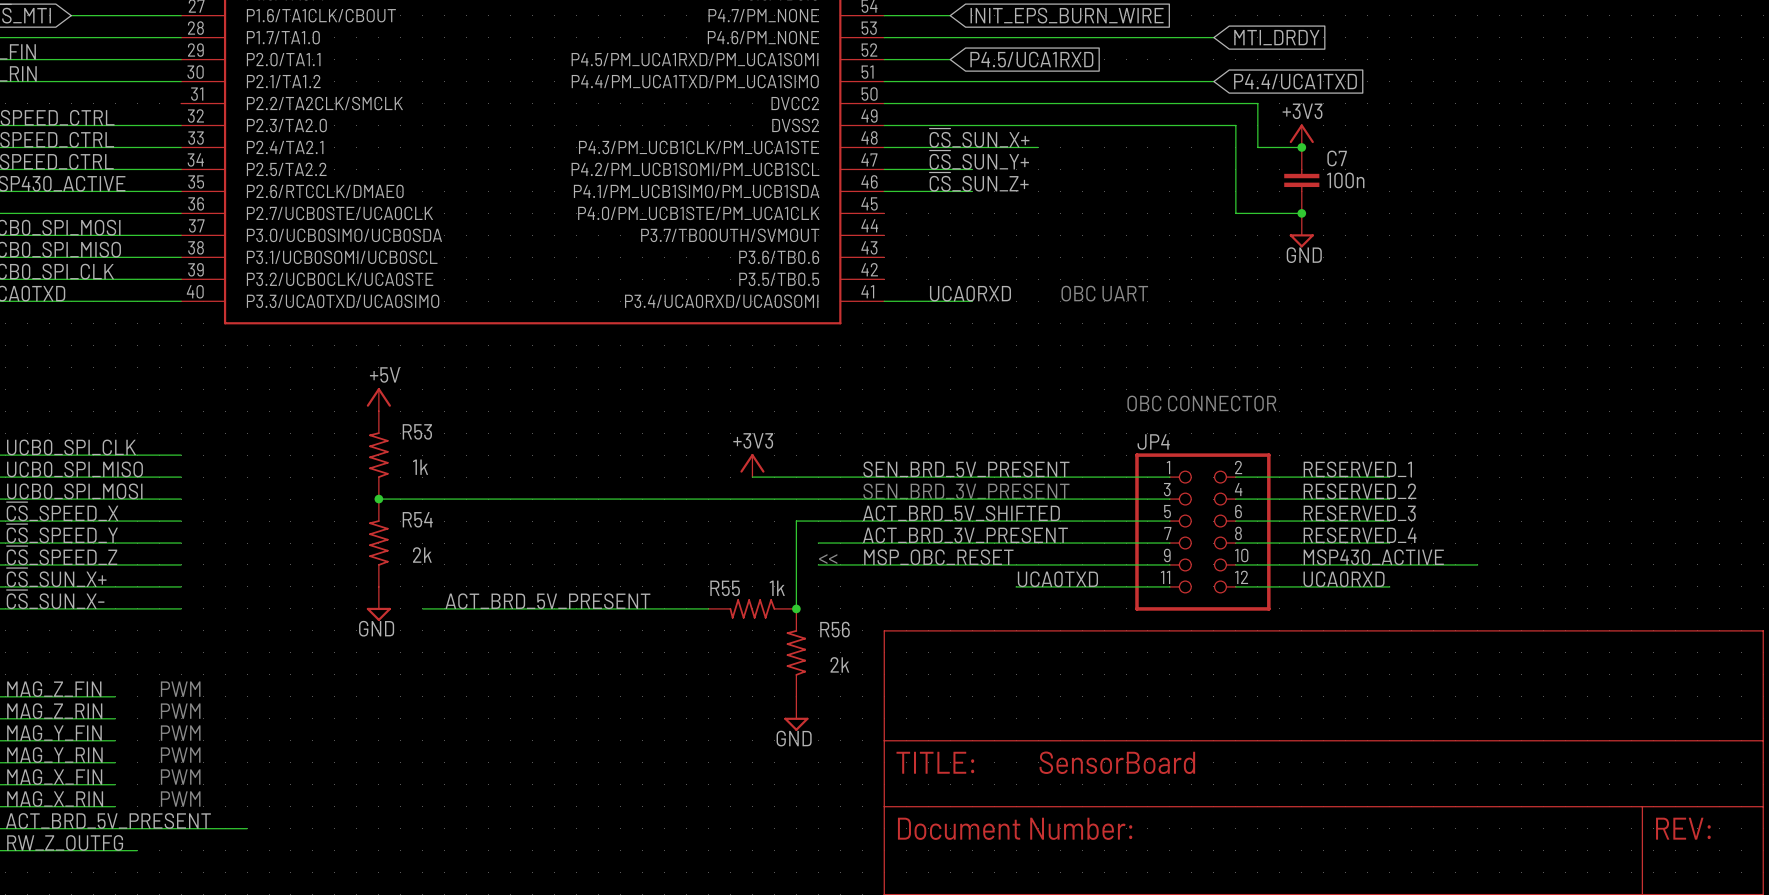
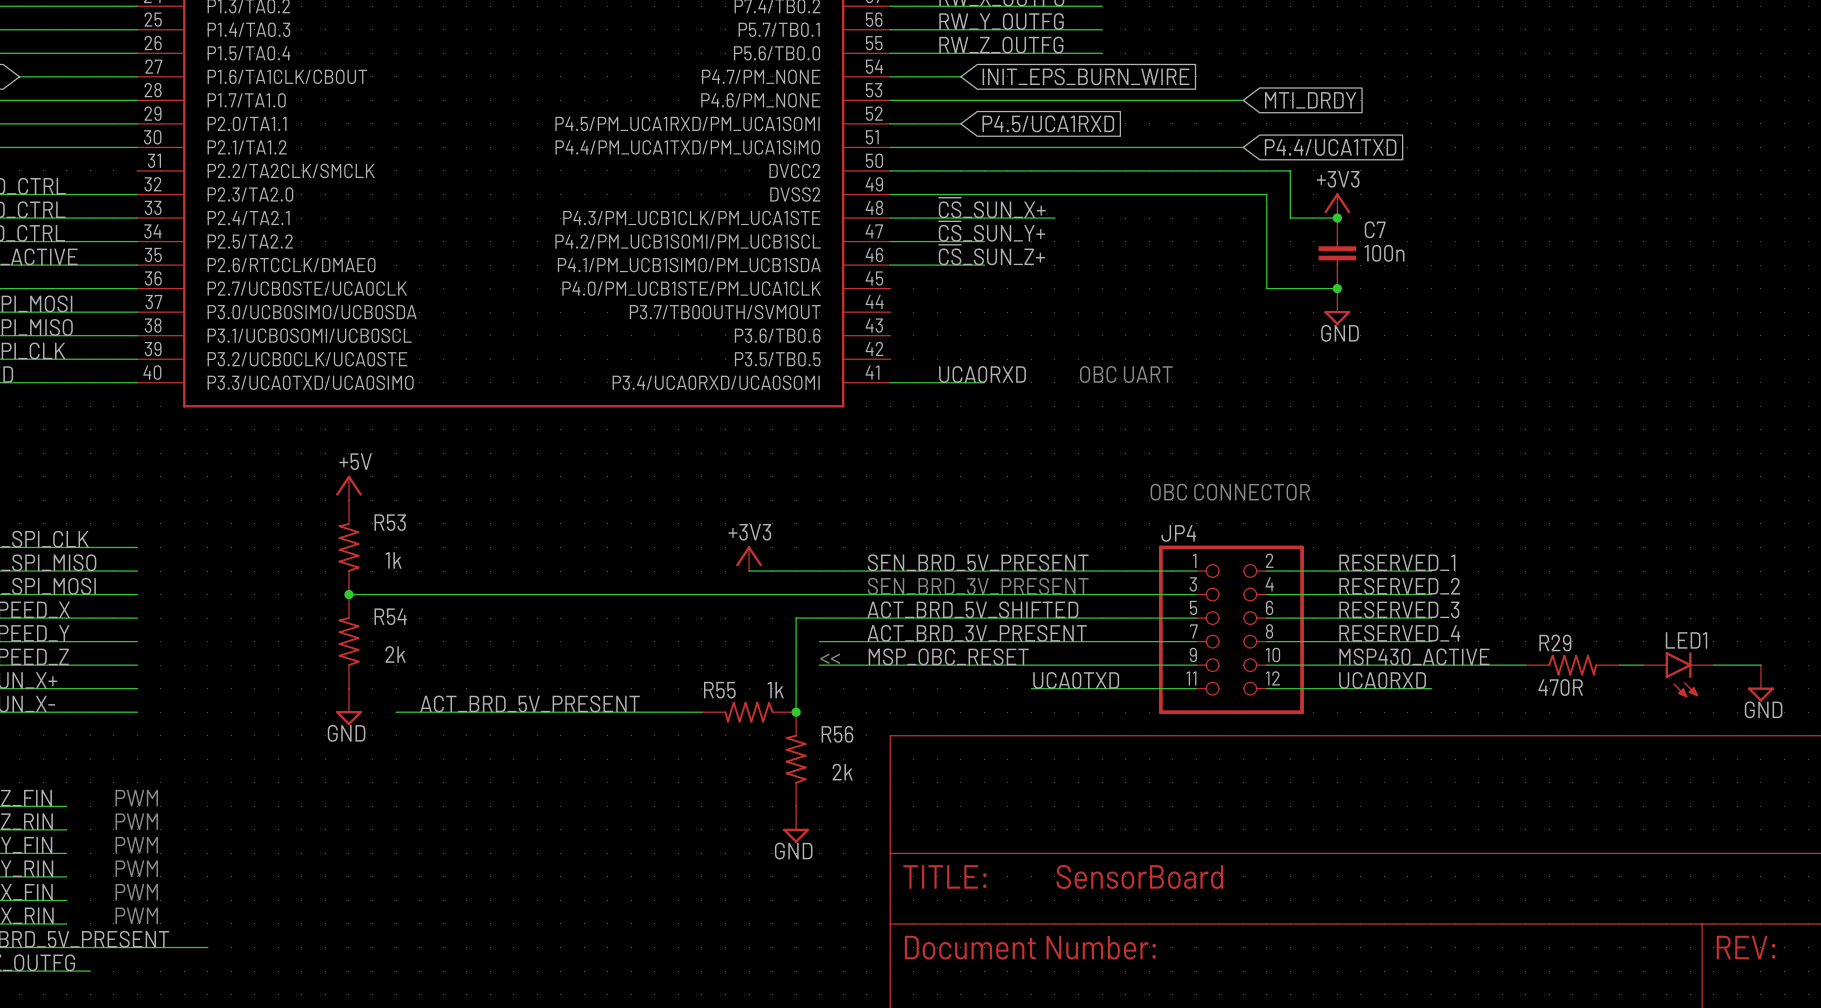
R29: none -> 470R (1572, 665)
wire: none -> (1619, 665) (1643, 665)
wire: none -> (1713, 665) (1760, 665)
LED1: none -> (1678, 674)
power symbol: none -> GND (1760, 683)

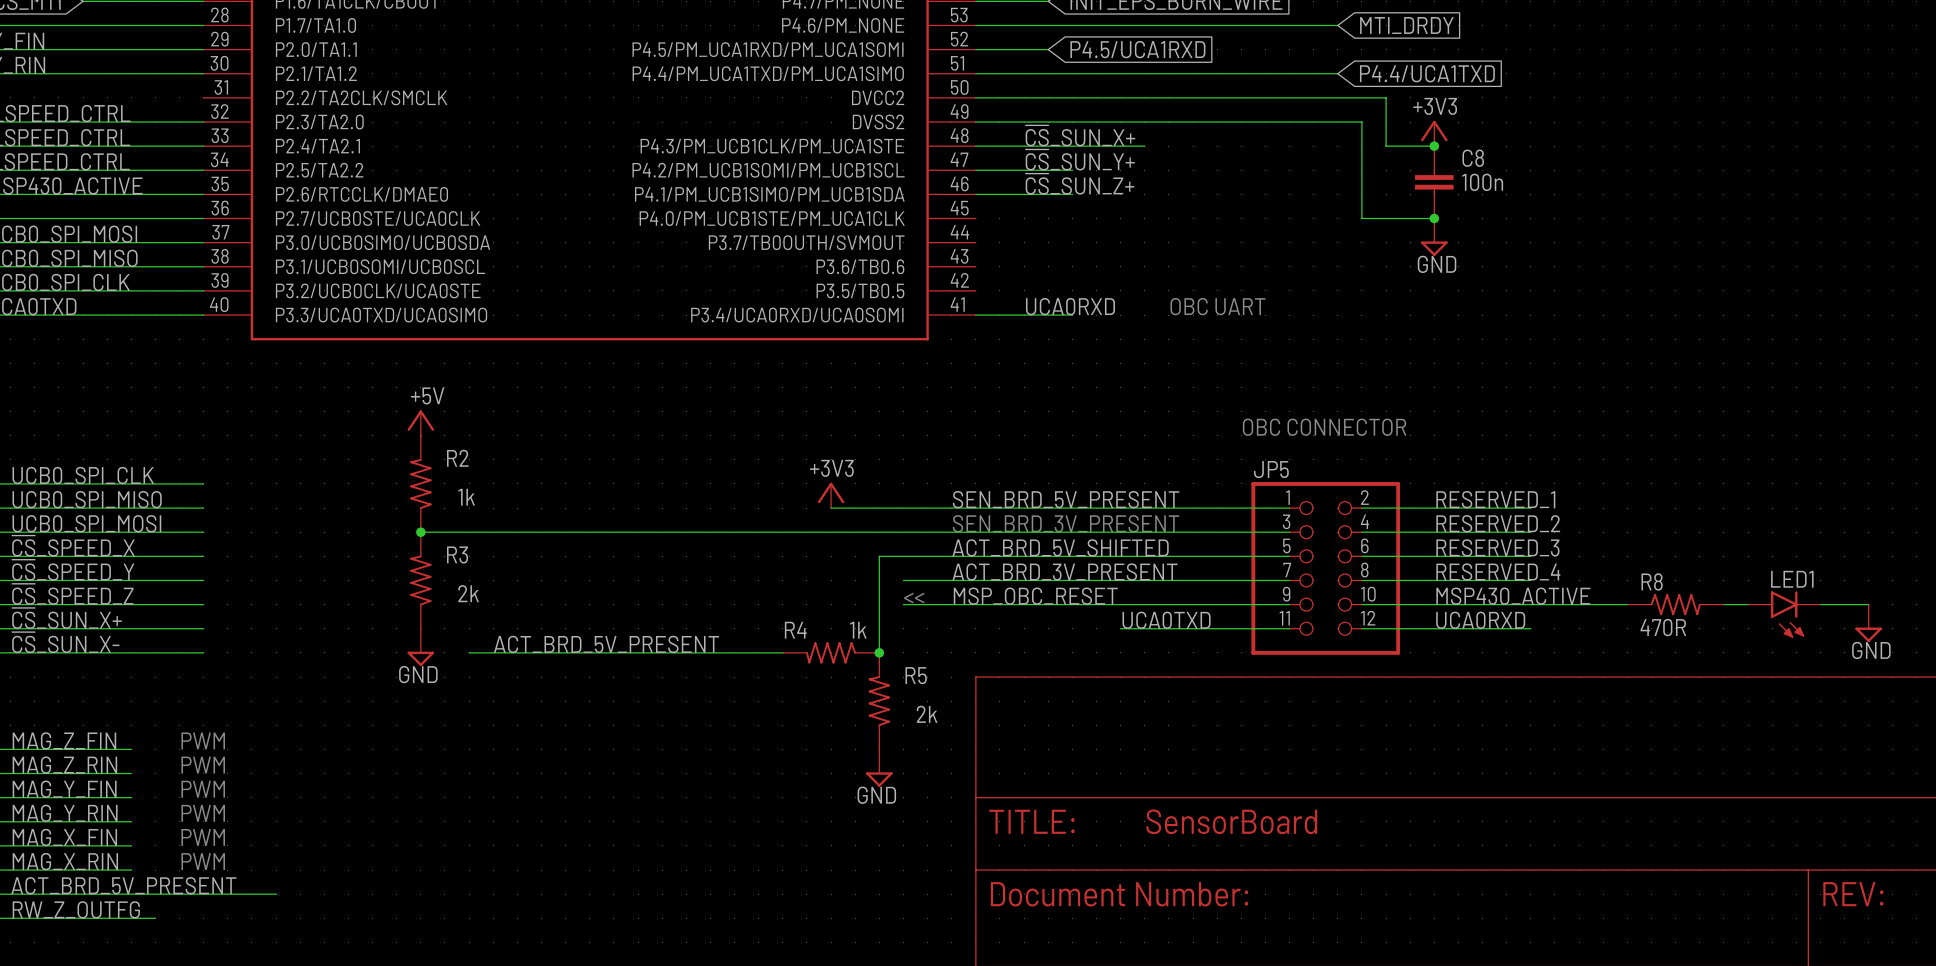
C7 name: C7 (1375, 229) -> C8 (1473, 158)
R53 name: R53 (390, 522) -> R2 (457, 458)
JP4 name: JP4 (1178, 533) -> JP5 (1271, 469)
R54 name: R54 (390, 616) -> R3 (457, 554)
R29 name: R29 (1555, 643) -> R8 (1652, 581)
R55 name: R55 (719, 690) -> R4 (795, 630)
R56 name: R56 (837, 734) -> R5 (916, 675)

